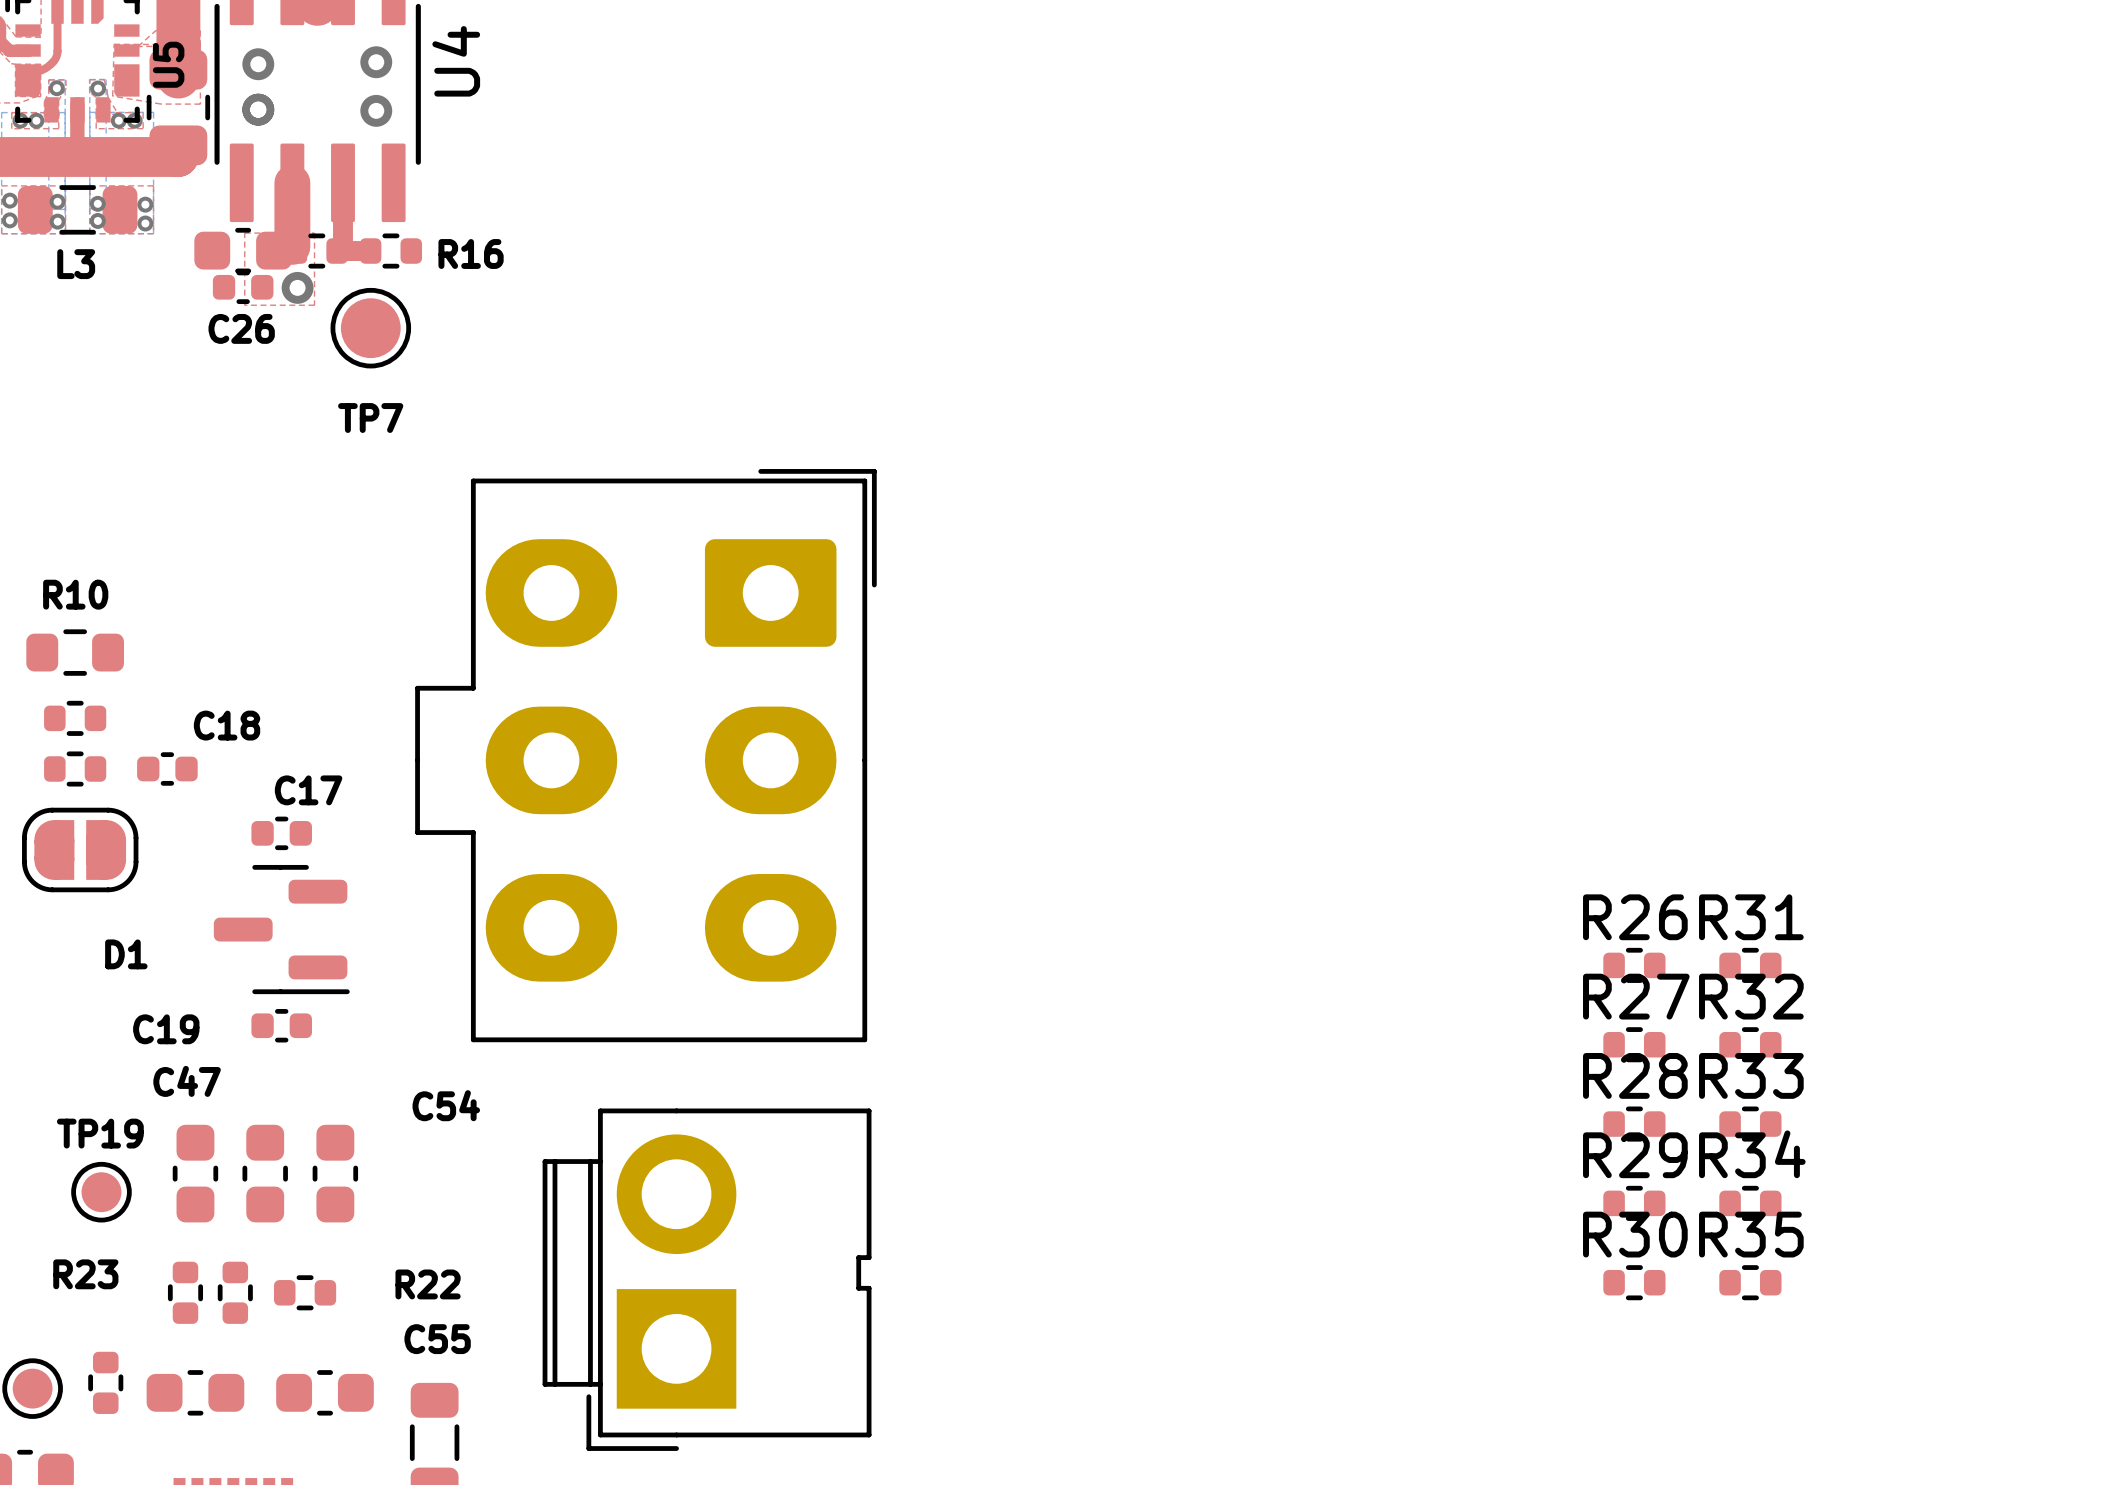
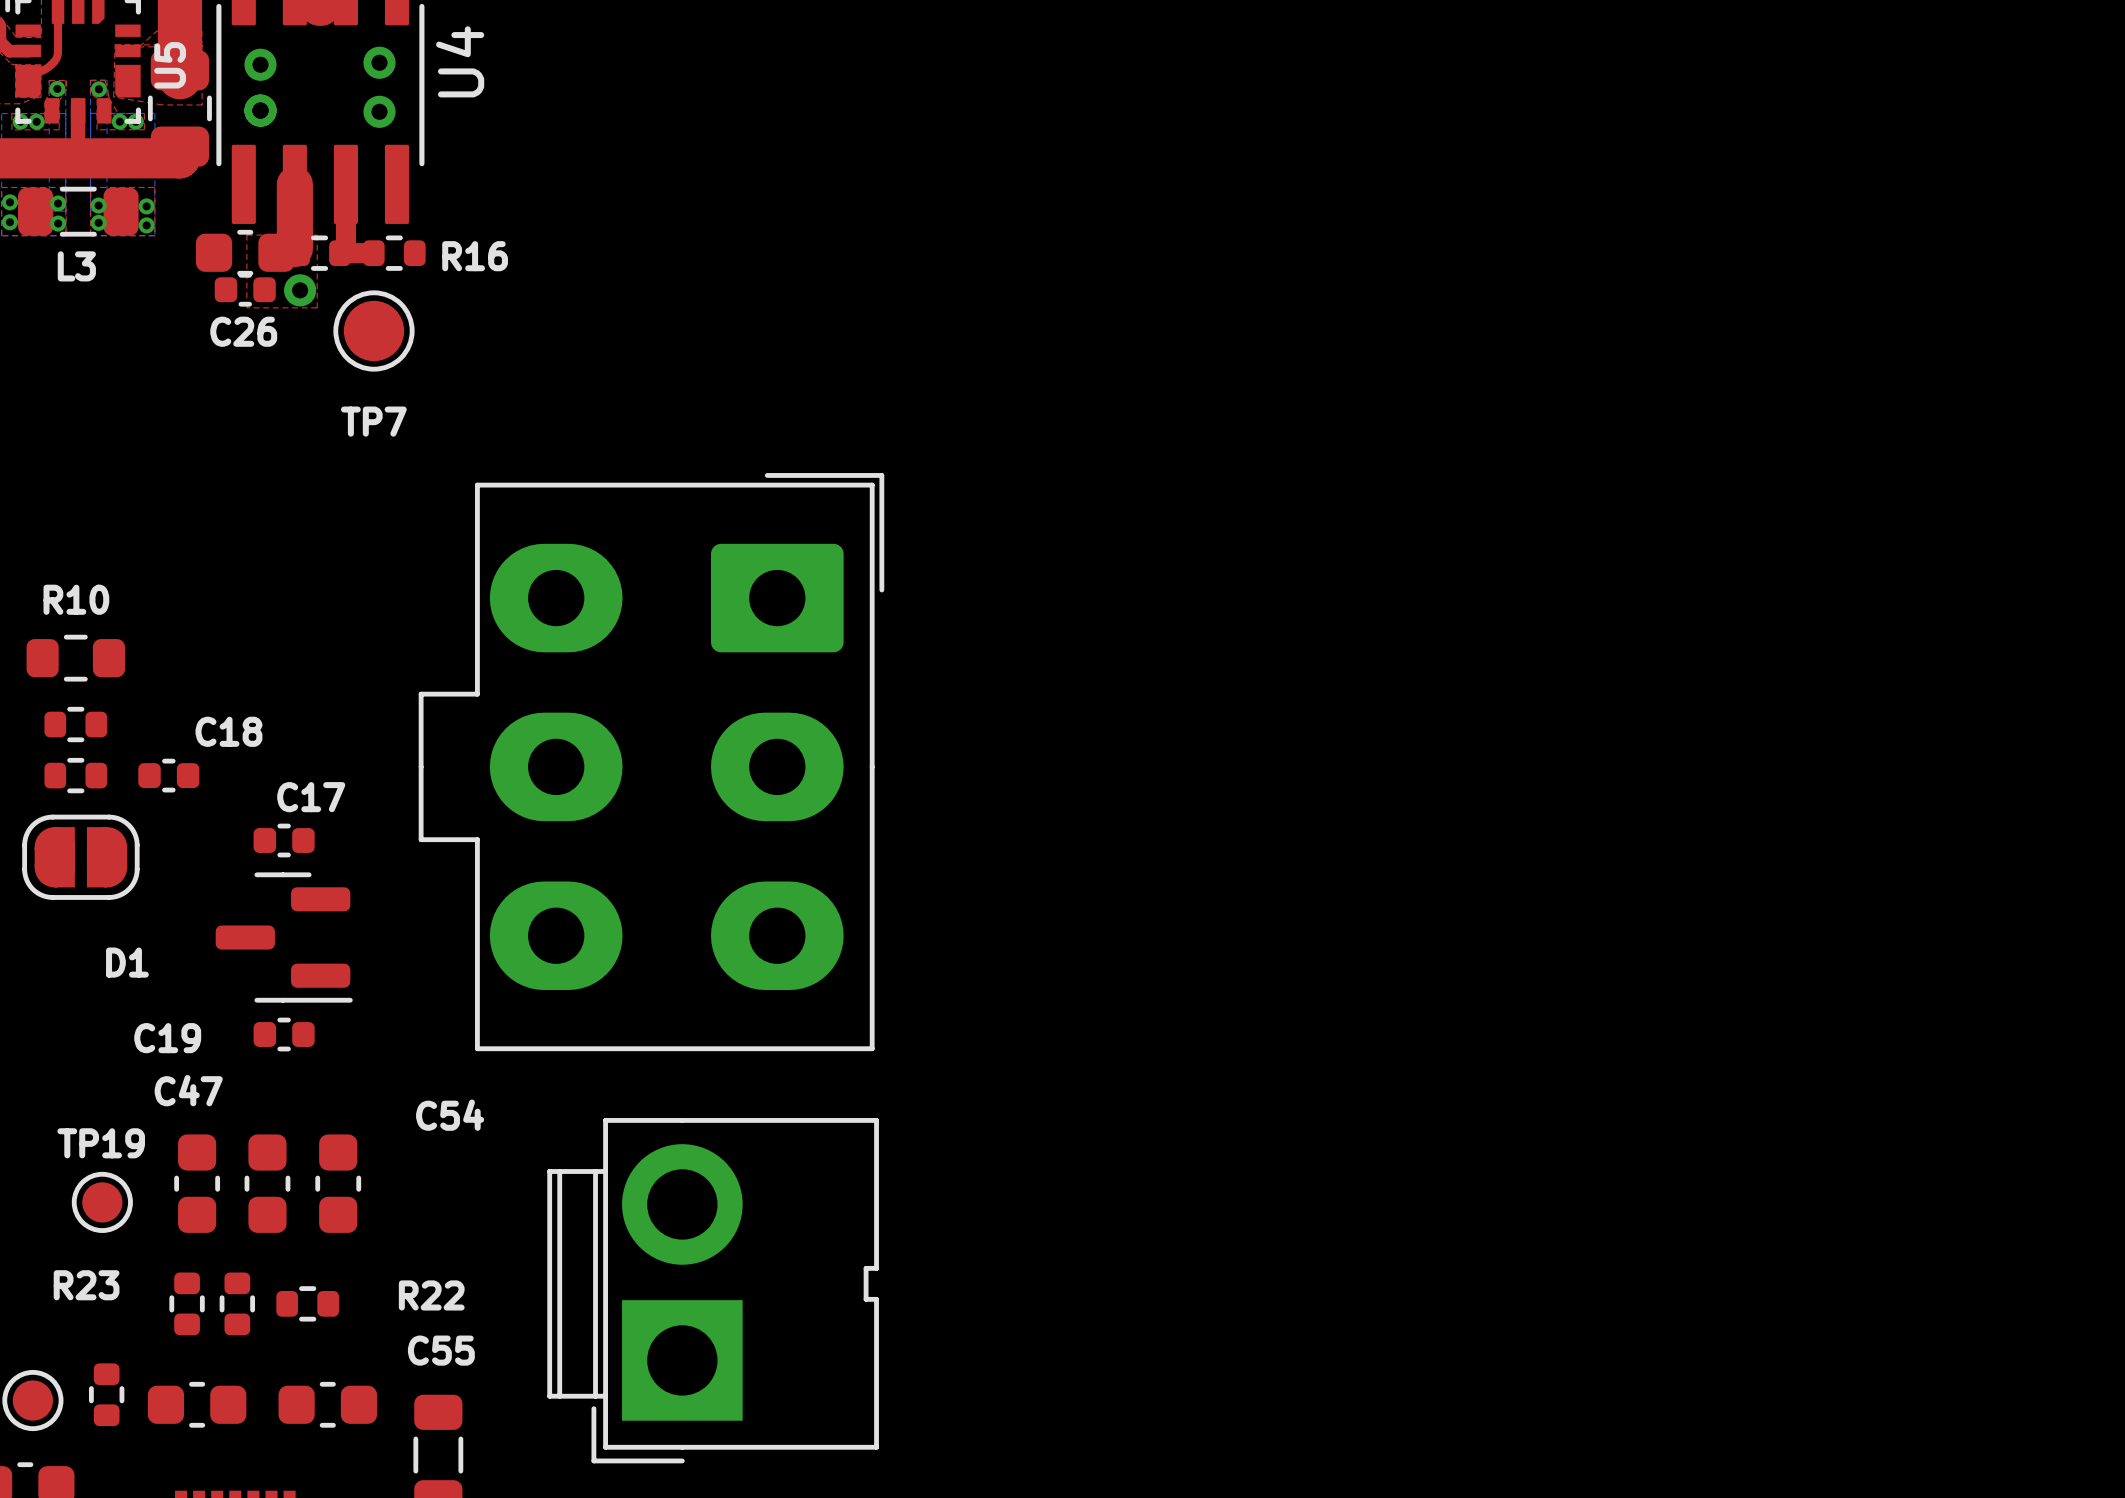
R26: (1634, 965) -> none
R31: (1750, 965) -> none
R27: (1634, 1044) -> none
R32: (1750, 1044) -> none
R28: (1634, 1124) -> none
R33: (1750, 1124) -> none
R29: (1634, 1203) -> none
R34: (1750, 1203) -> none
R30: (1634, 1282) -> none
R35: (1750, 1282) -> none

